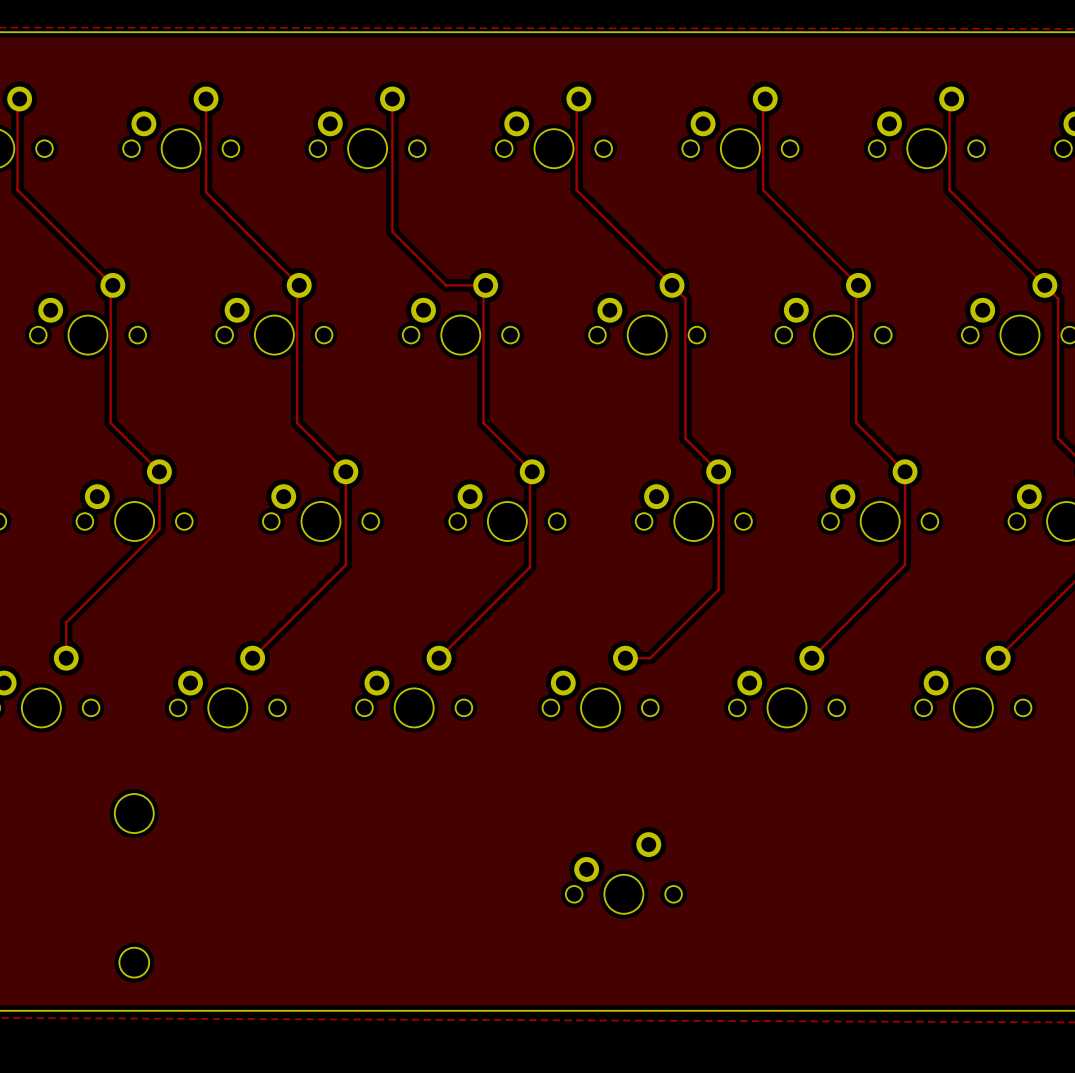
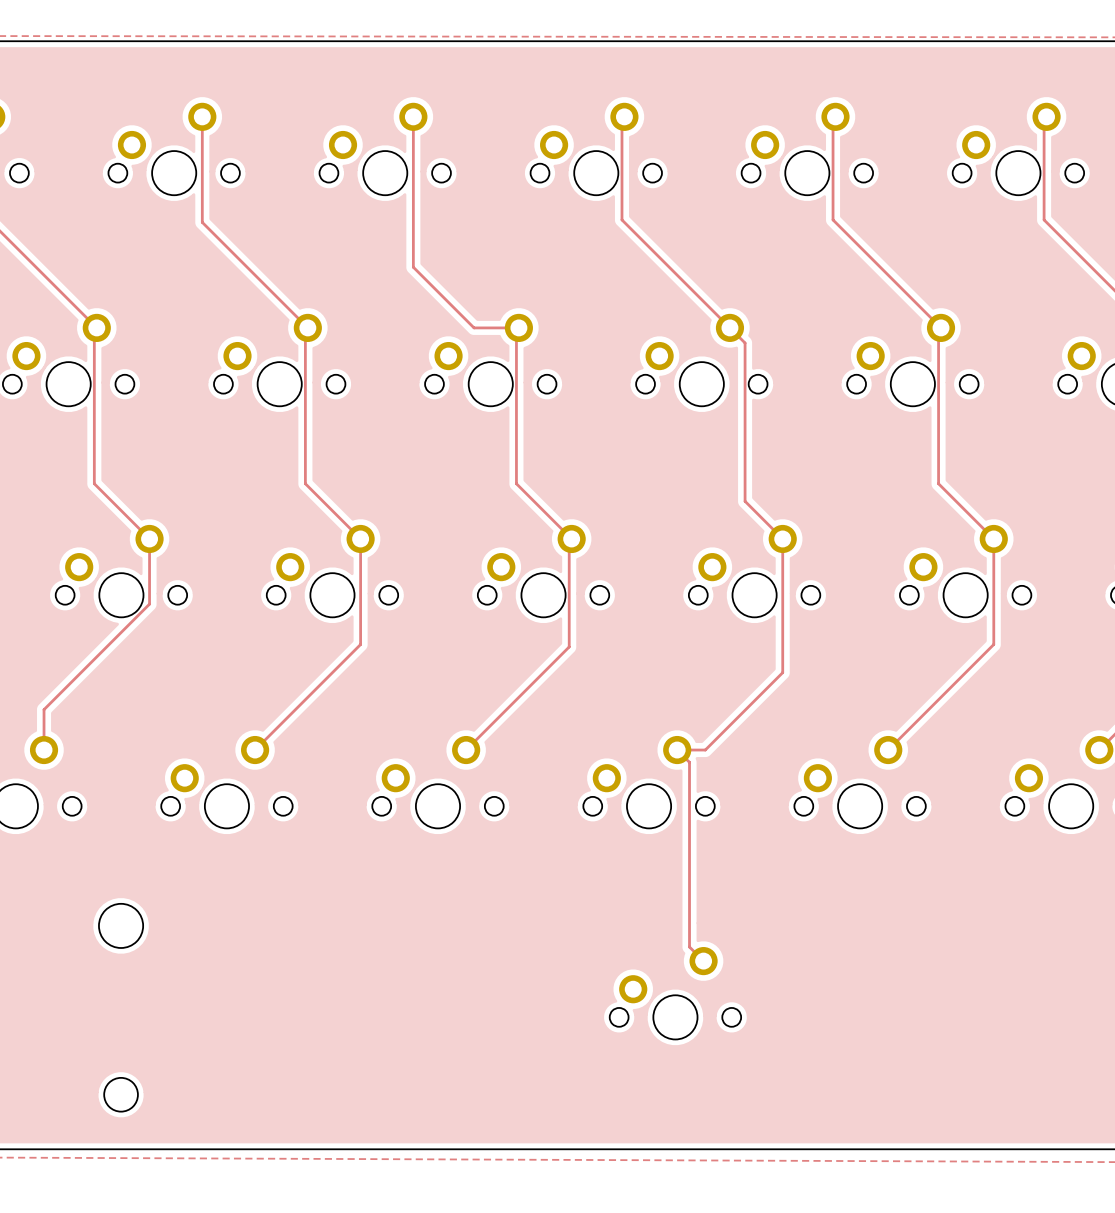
track: none -> (677, 750) (689, 762) (689, 947) (703, 961)

